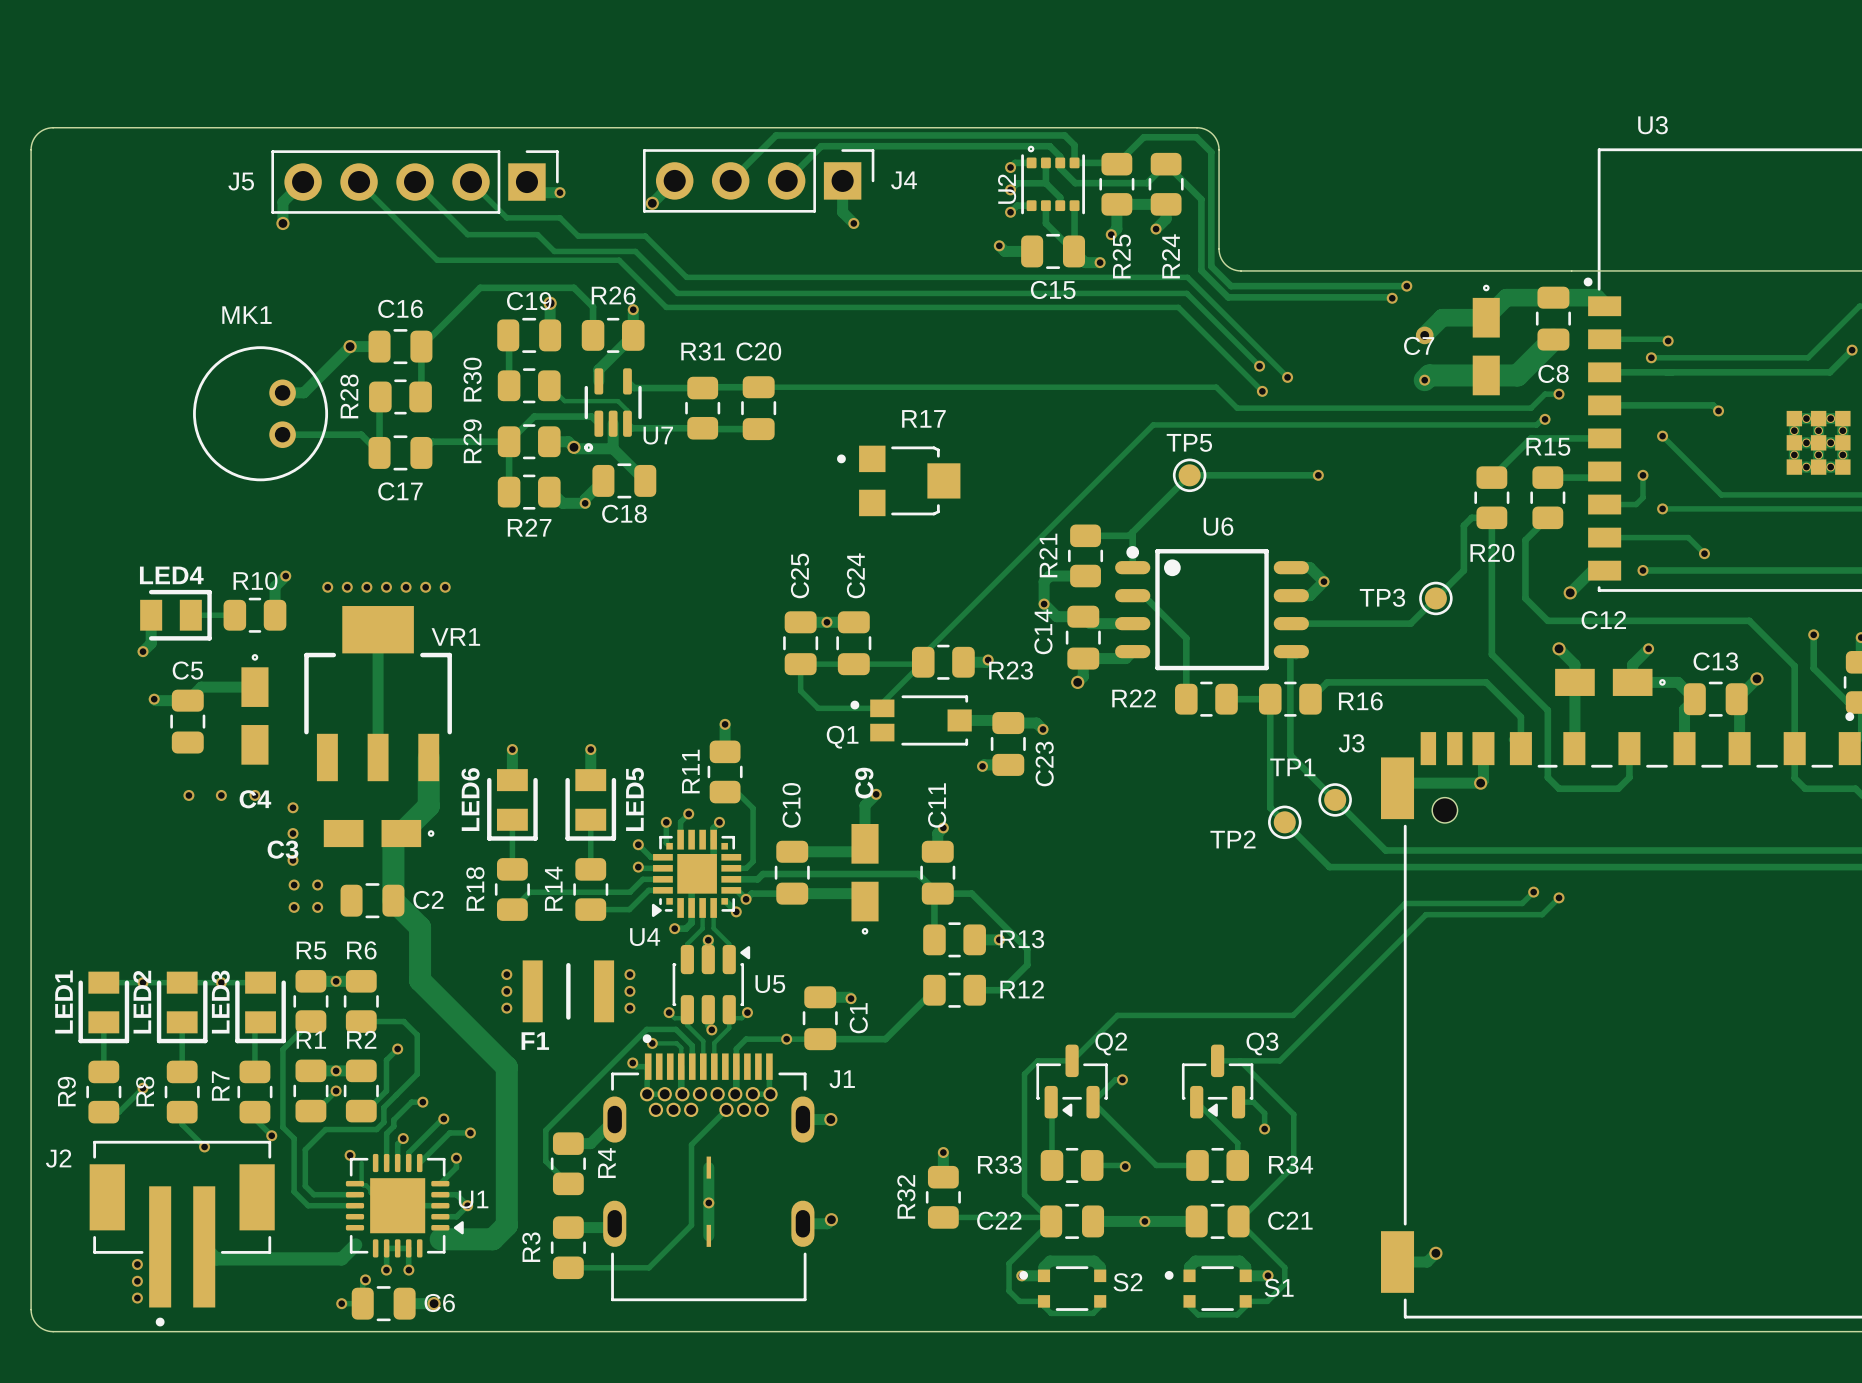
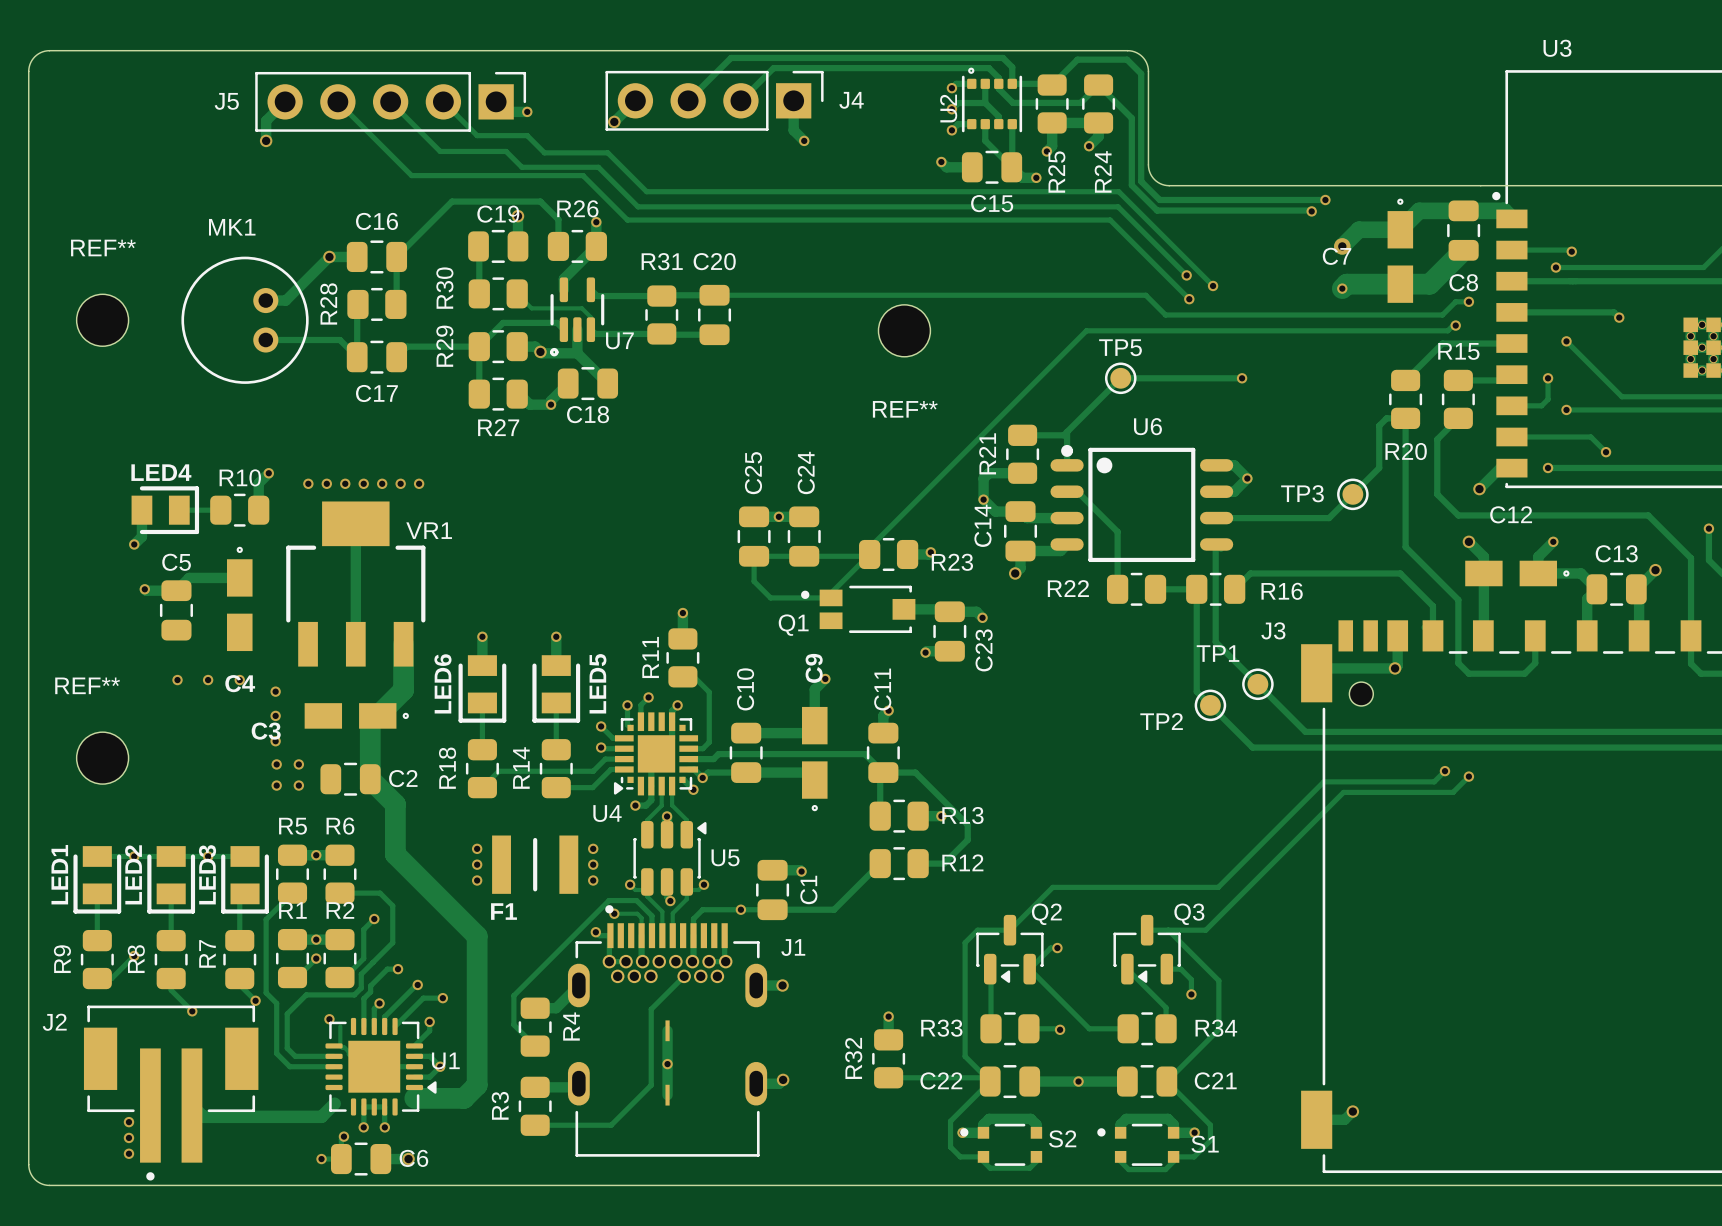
REF**: none -> (102, 320)
REF**: none -> (904, 330)
R17: (898, 480) -> none
REF**: none -> (102, 758)

